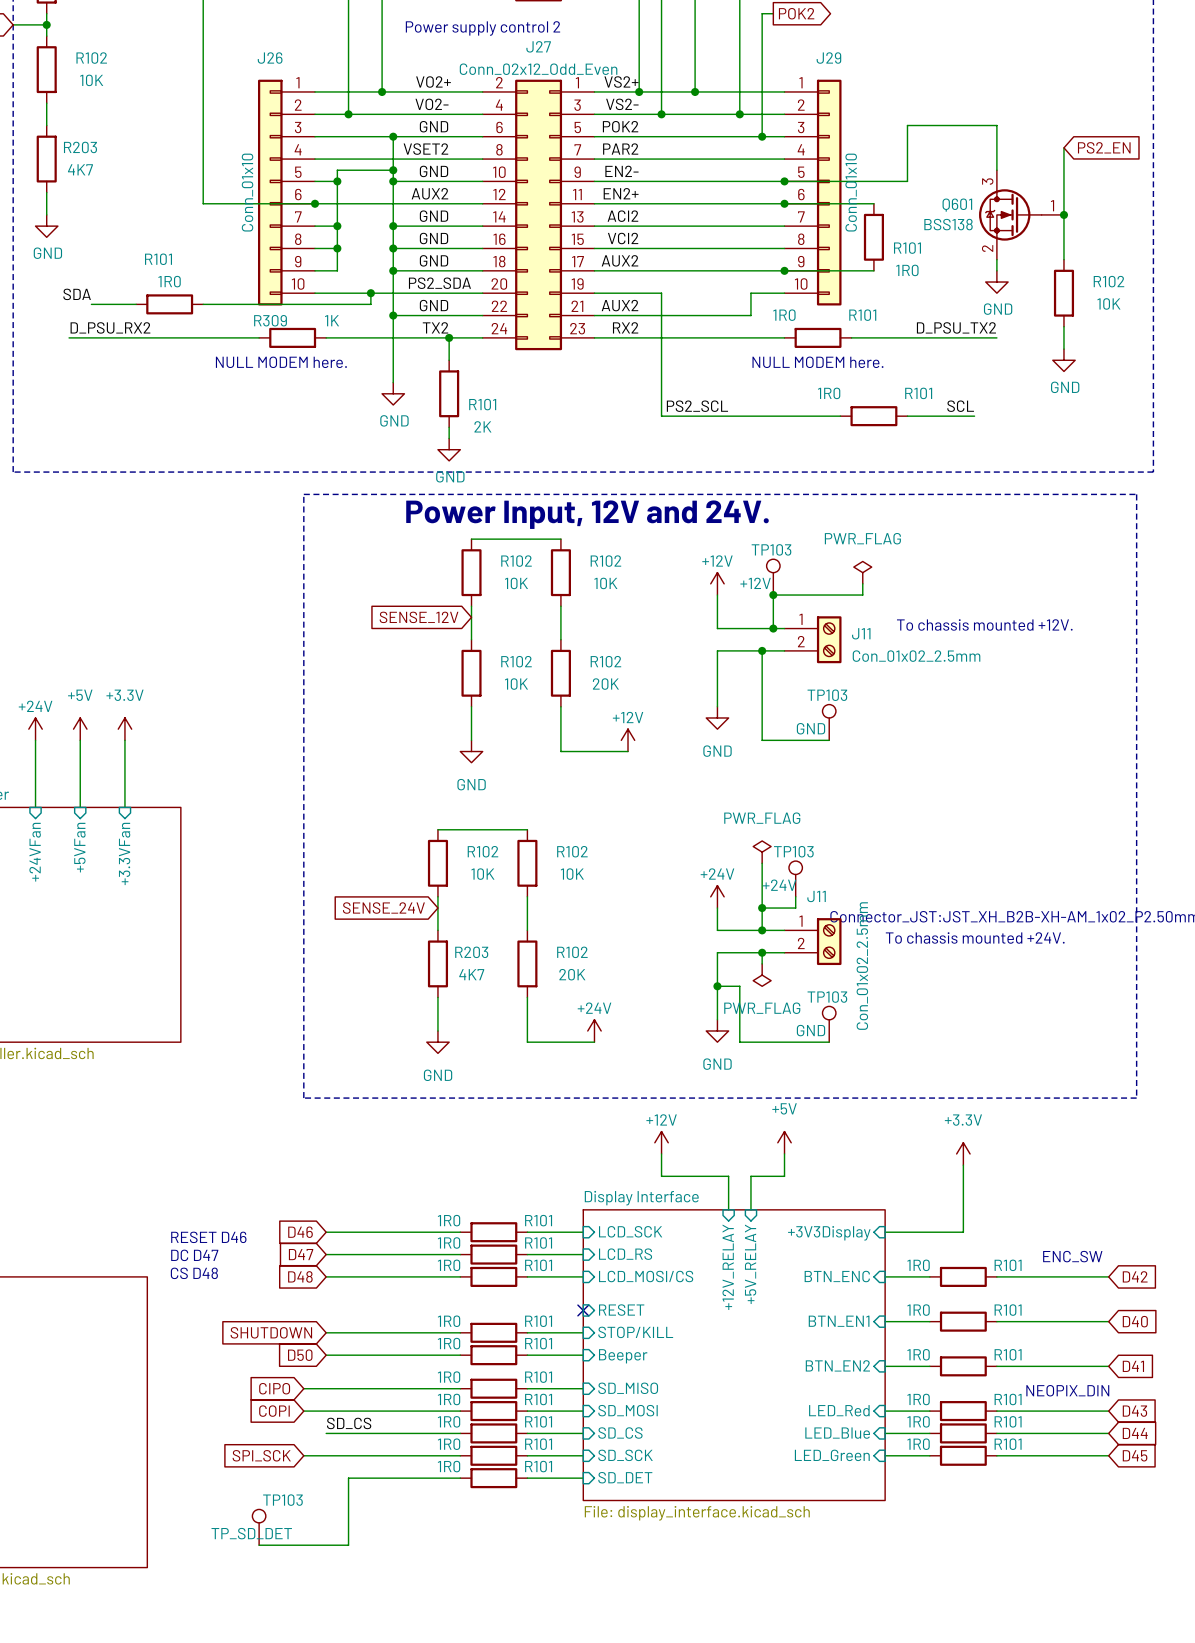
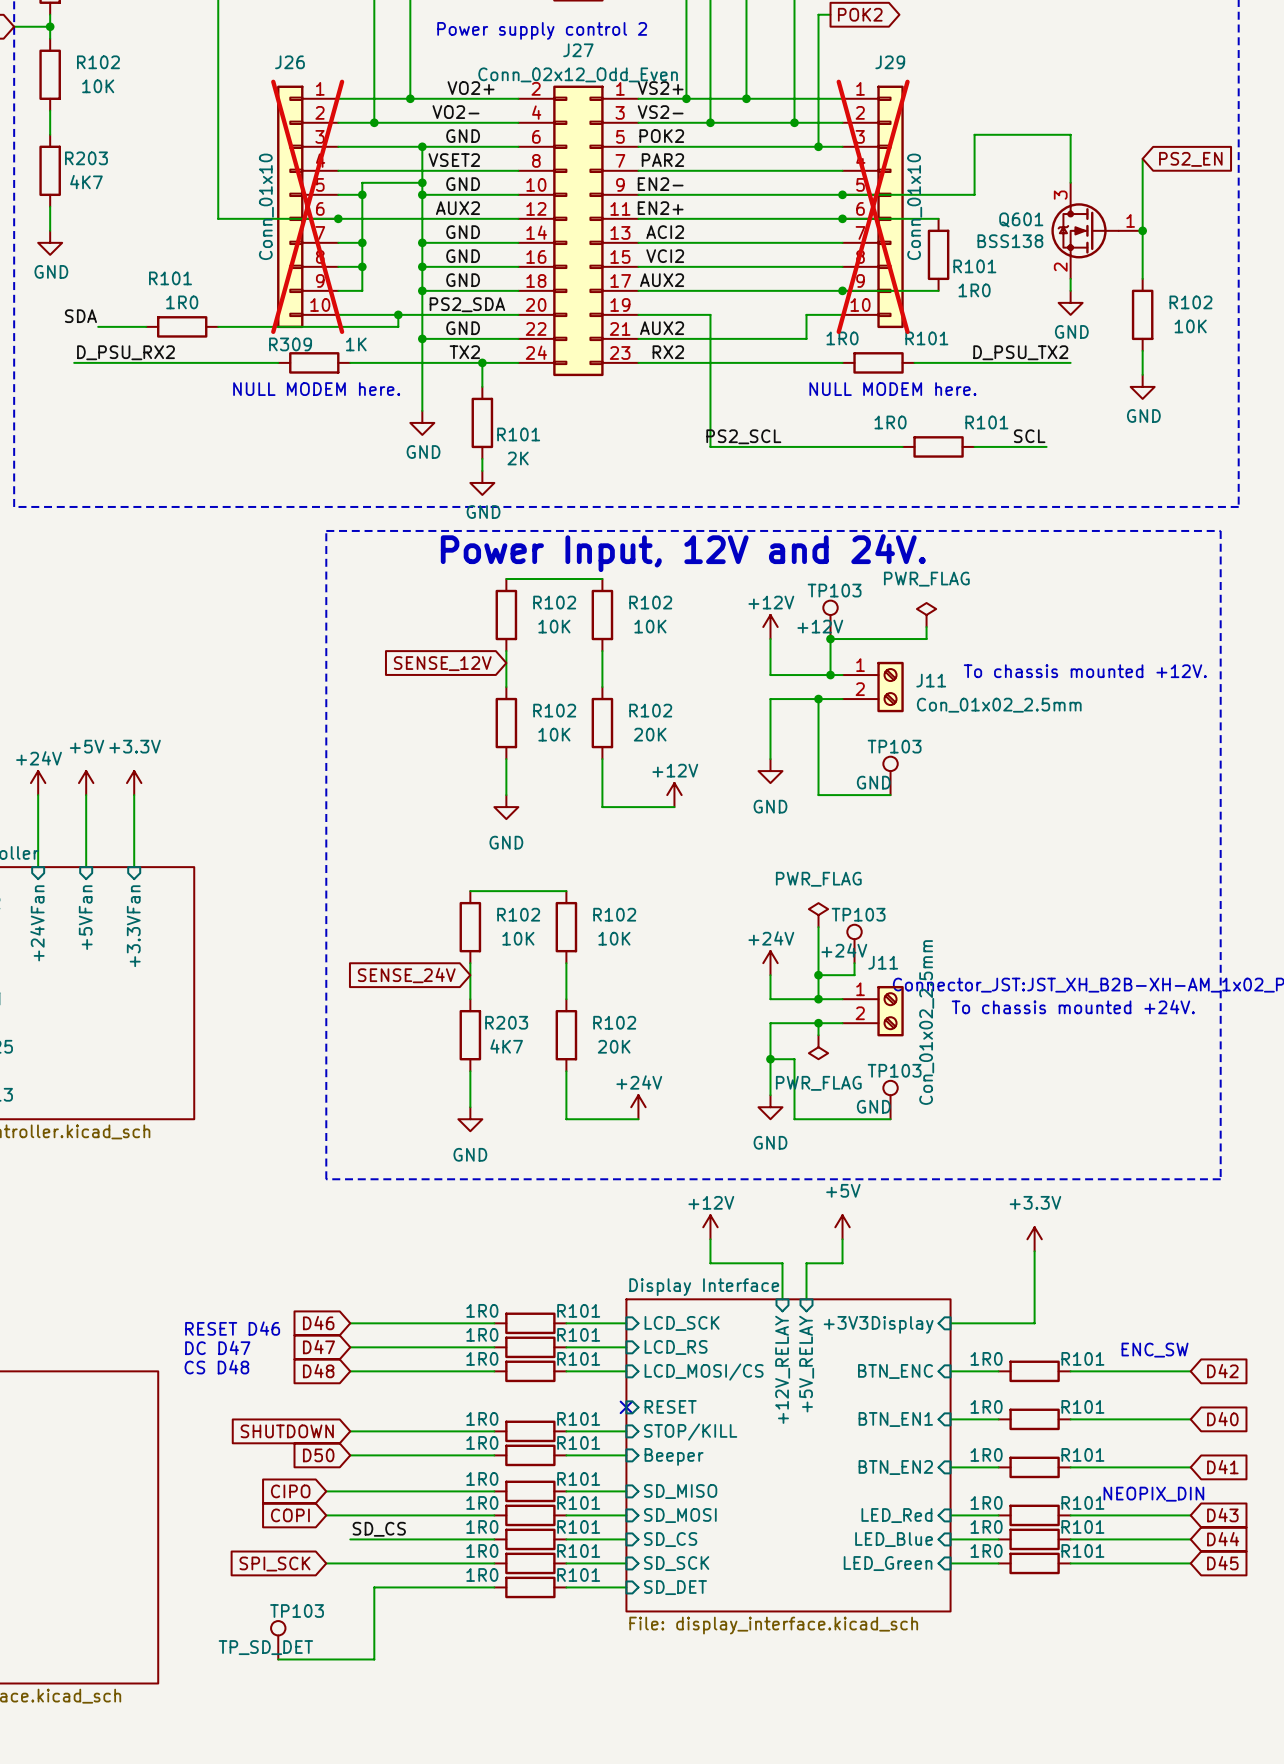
J26 do-not-place cross: none -> (307, 206)
J29 do-not-place cross: none -> (873, 206)

